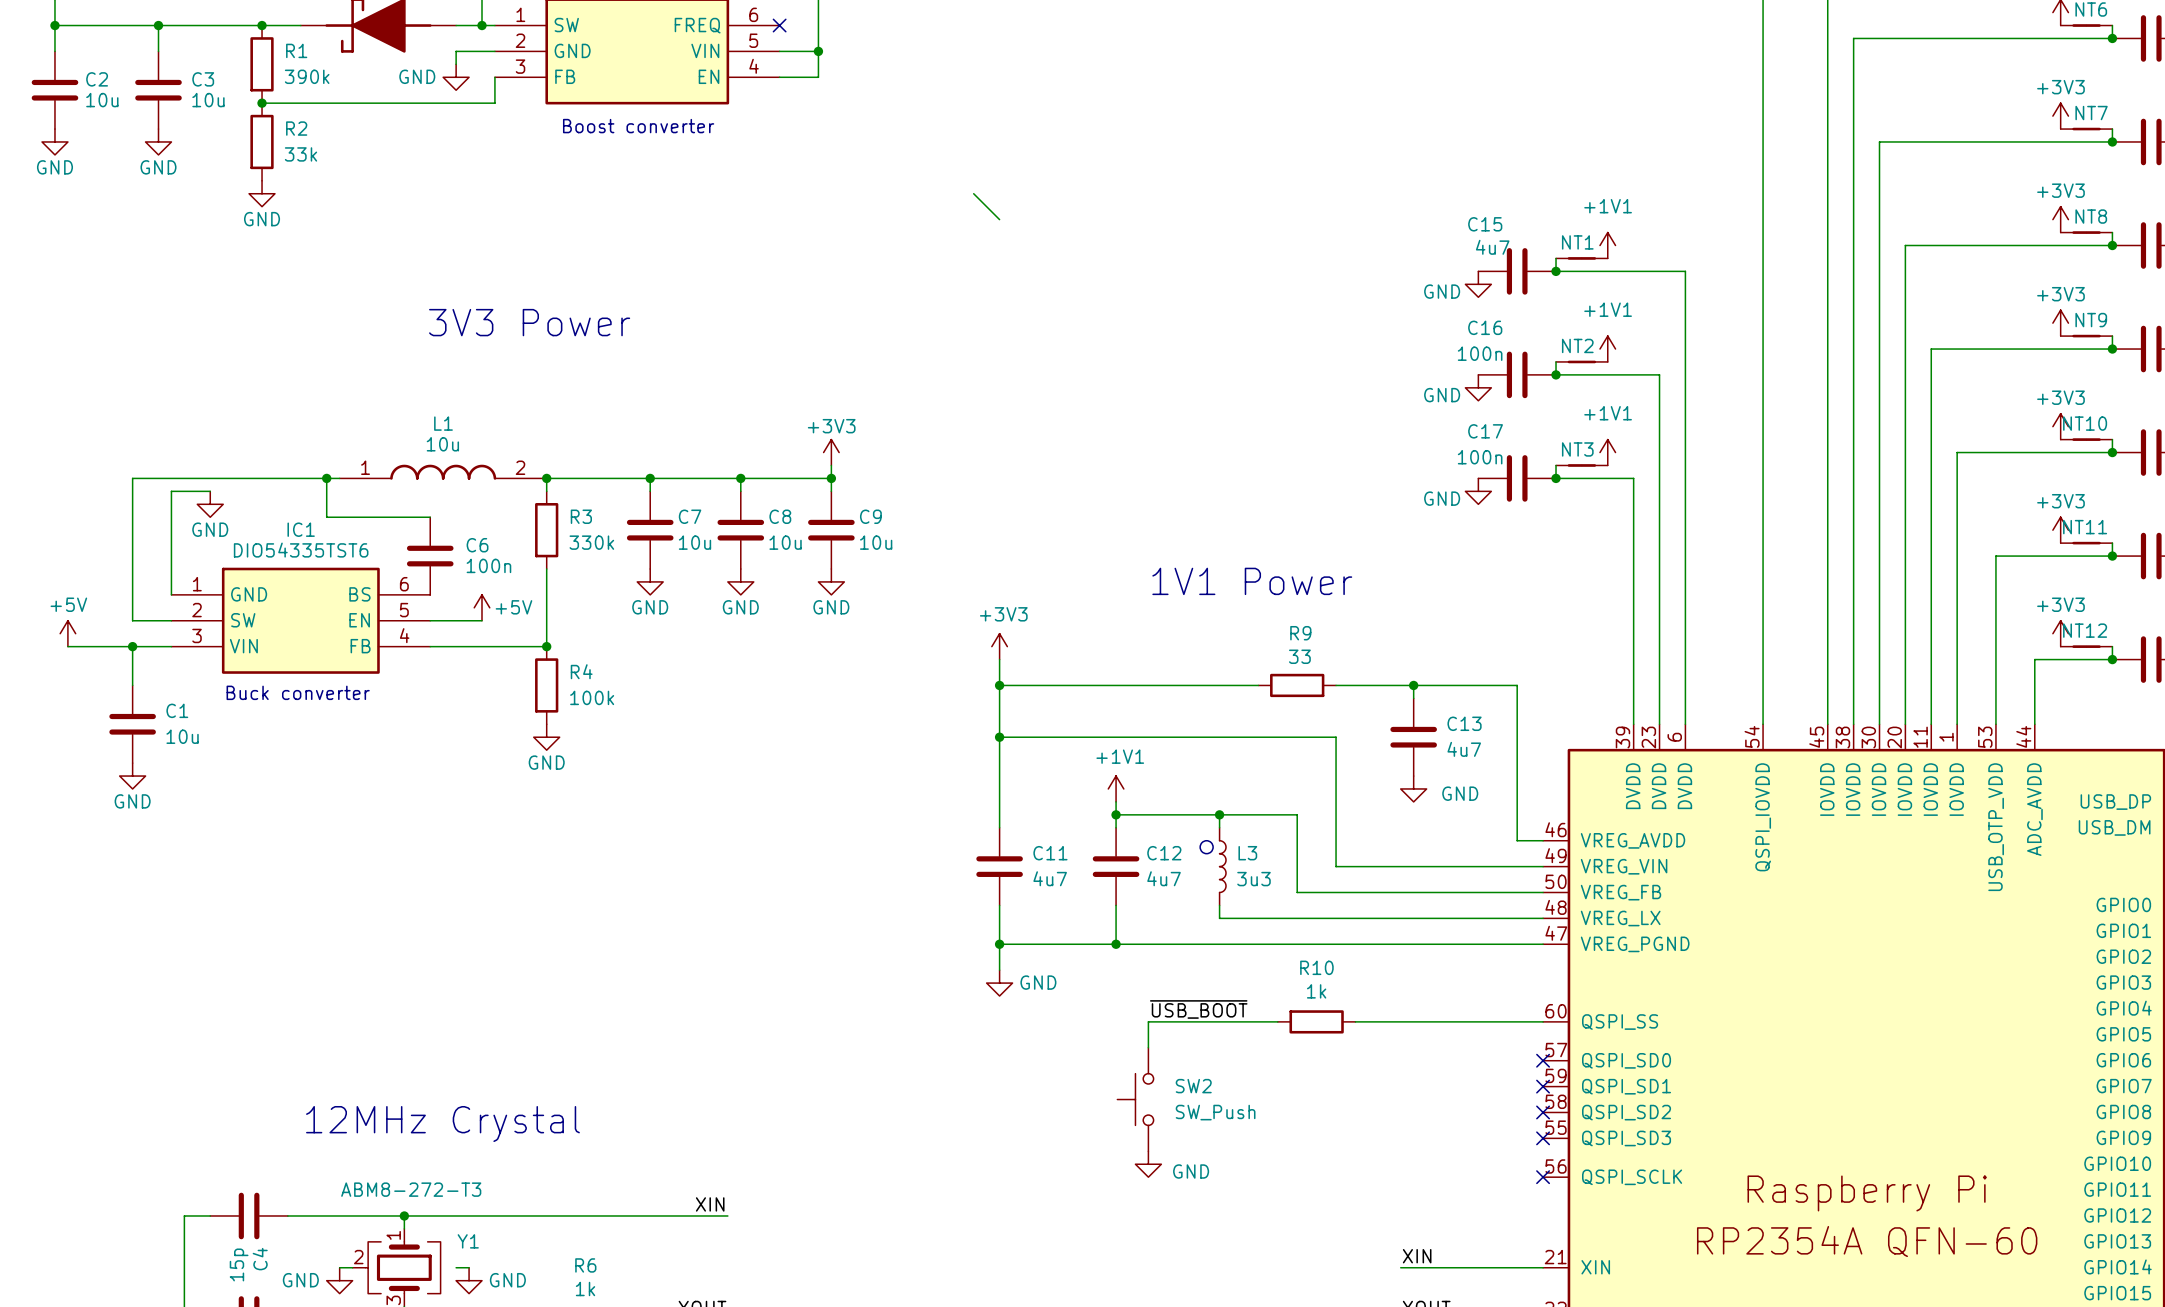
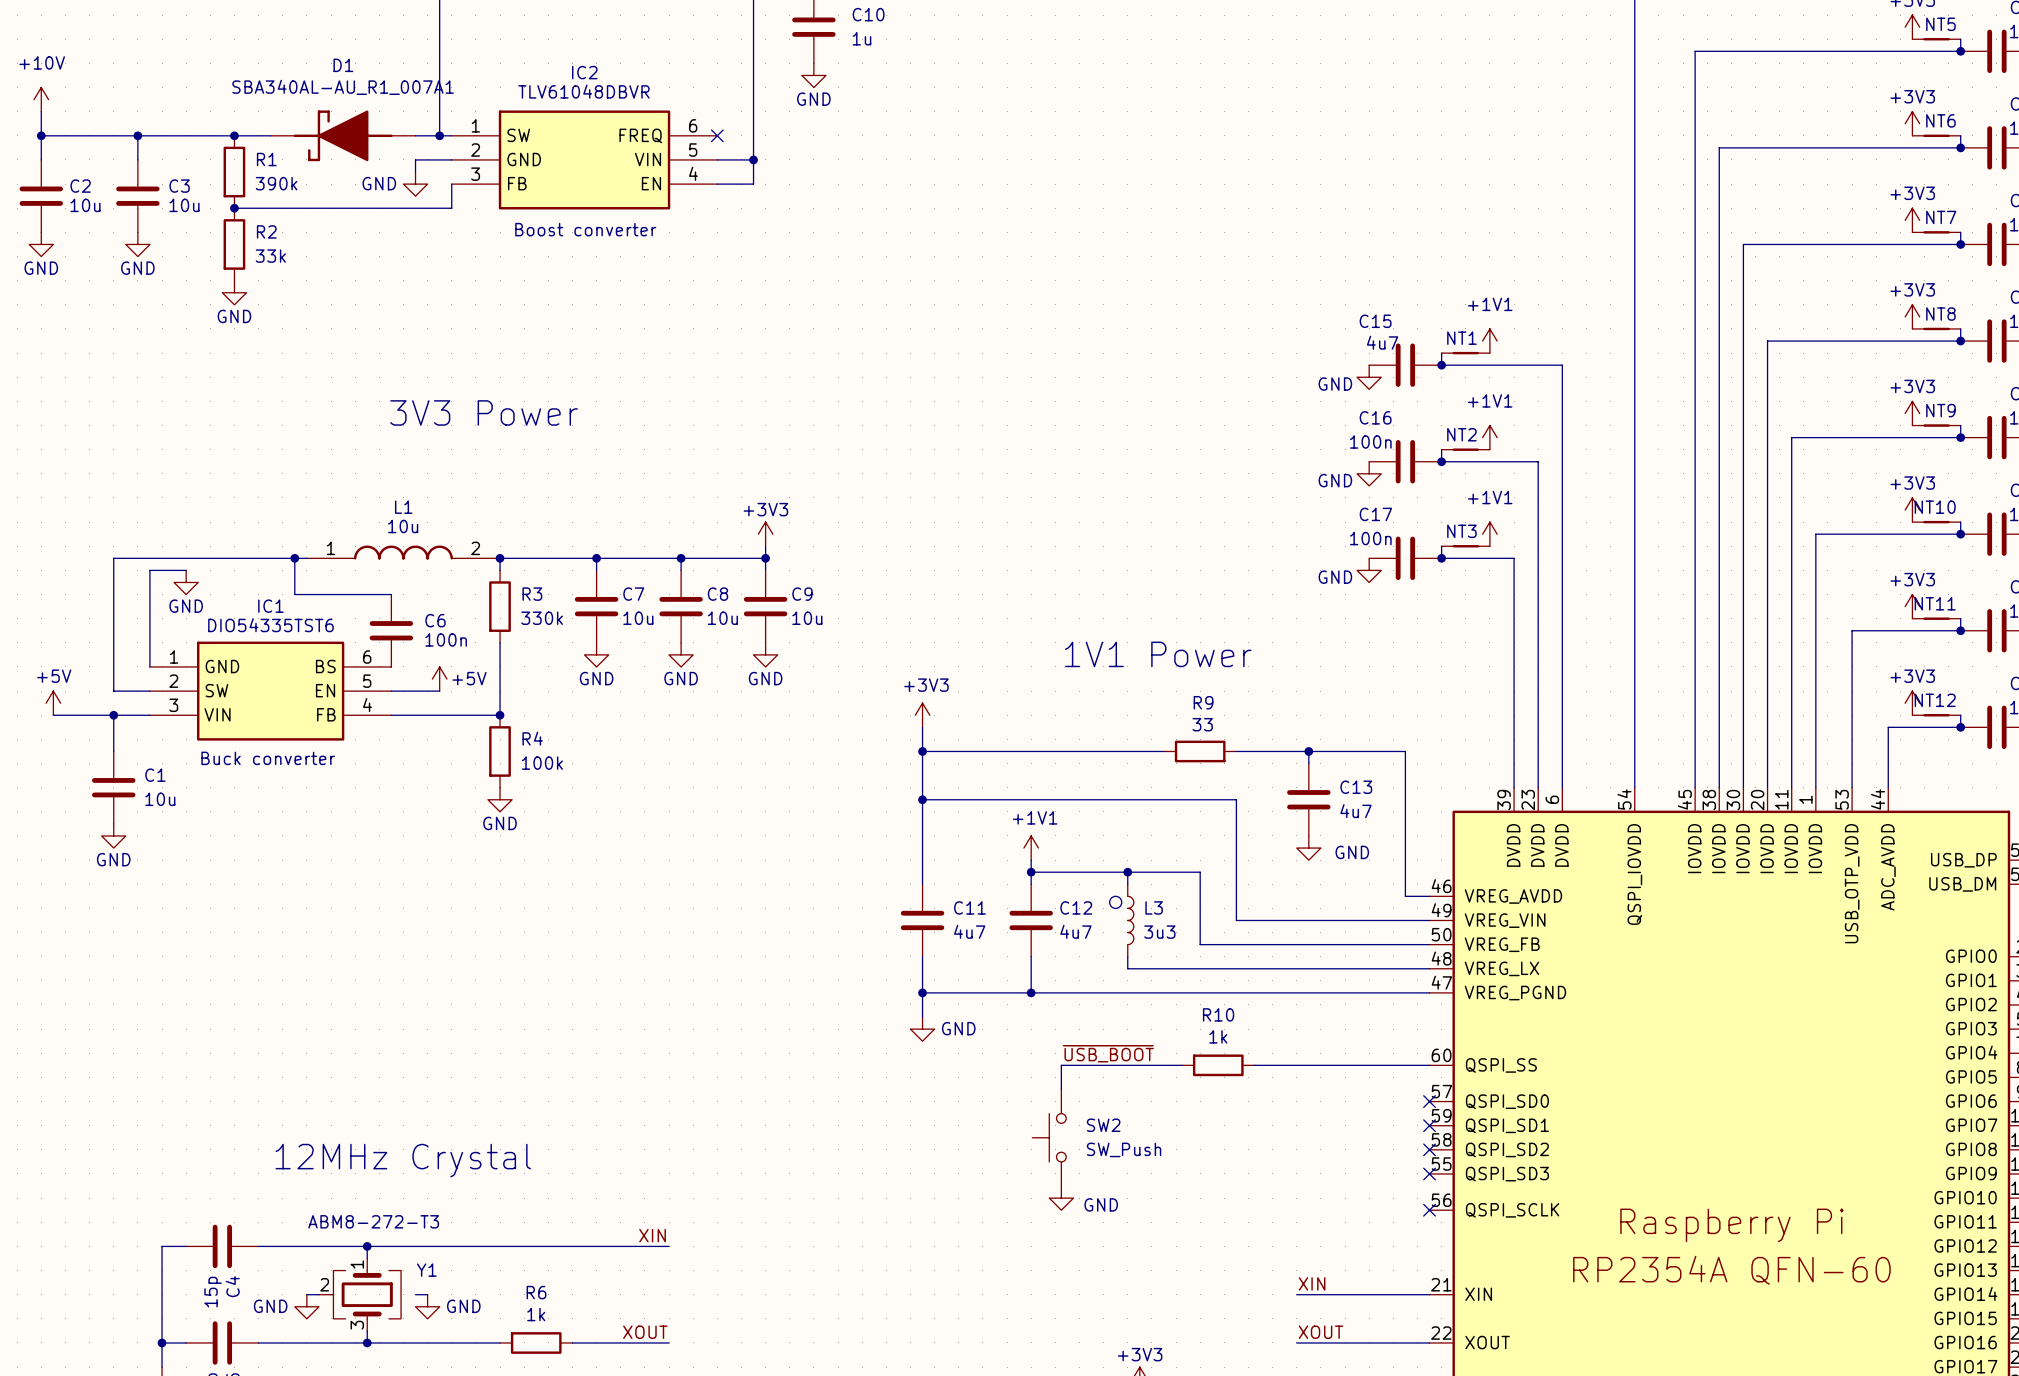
wire: (973, 193) (999, 219) -> none

